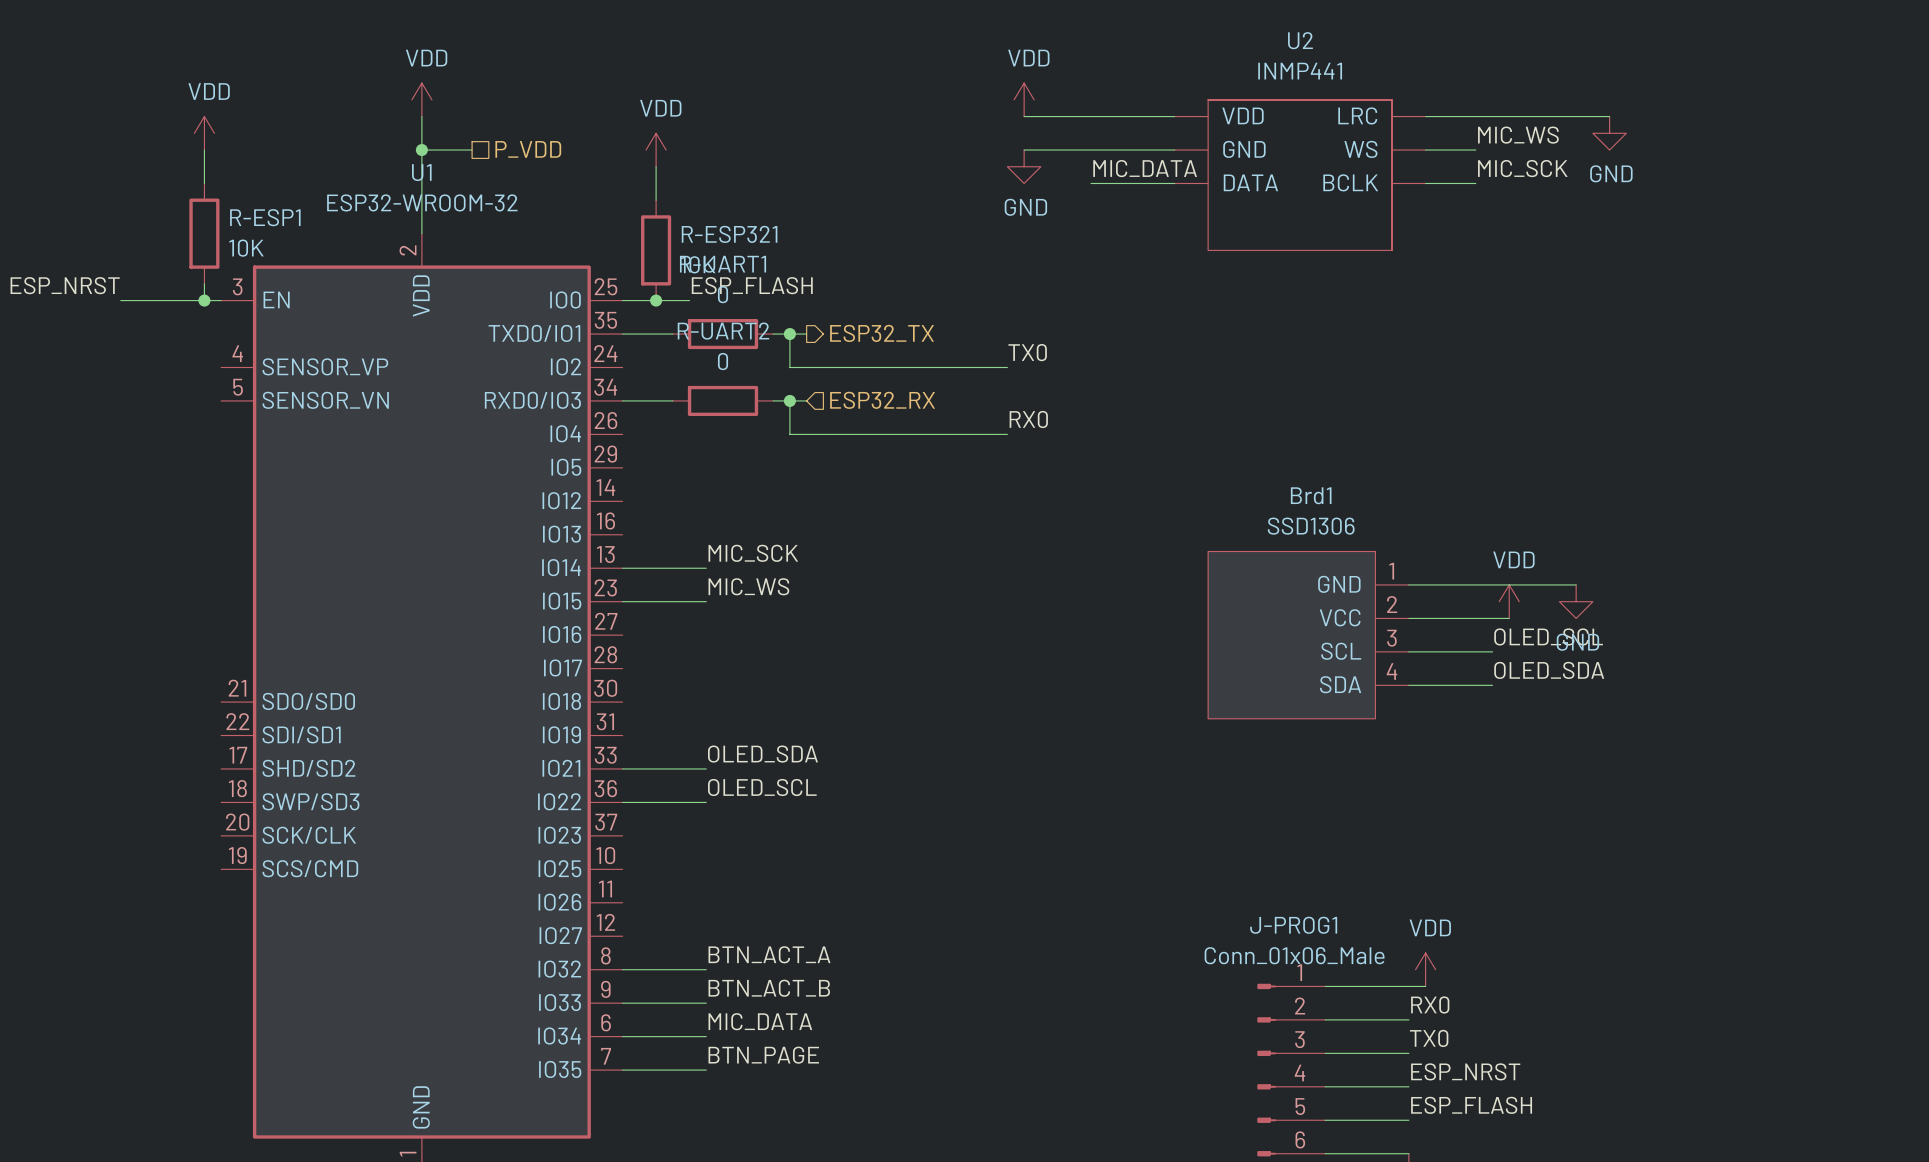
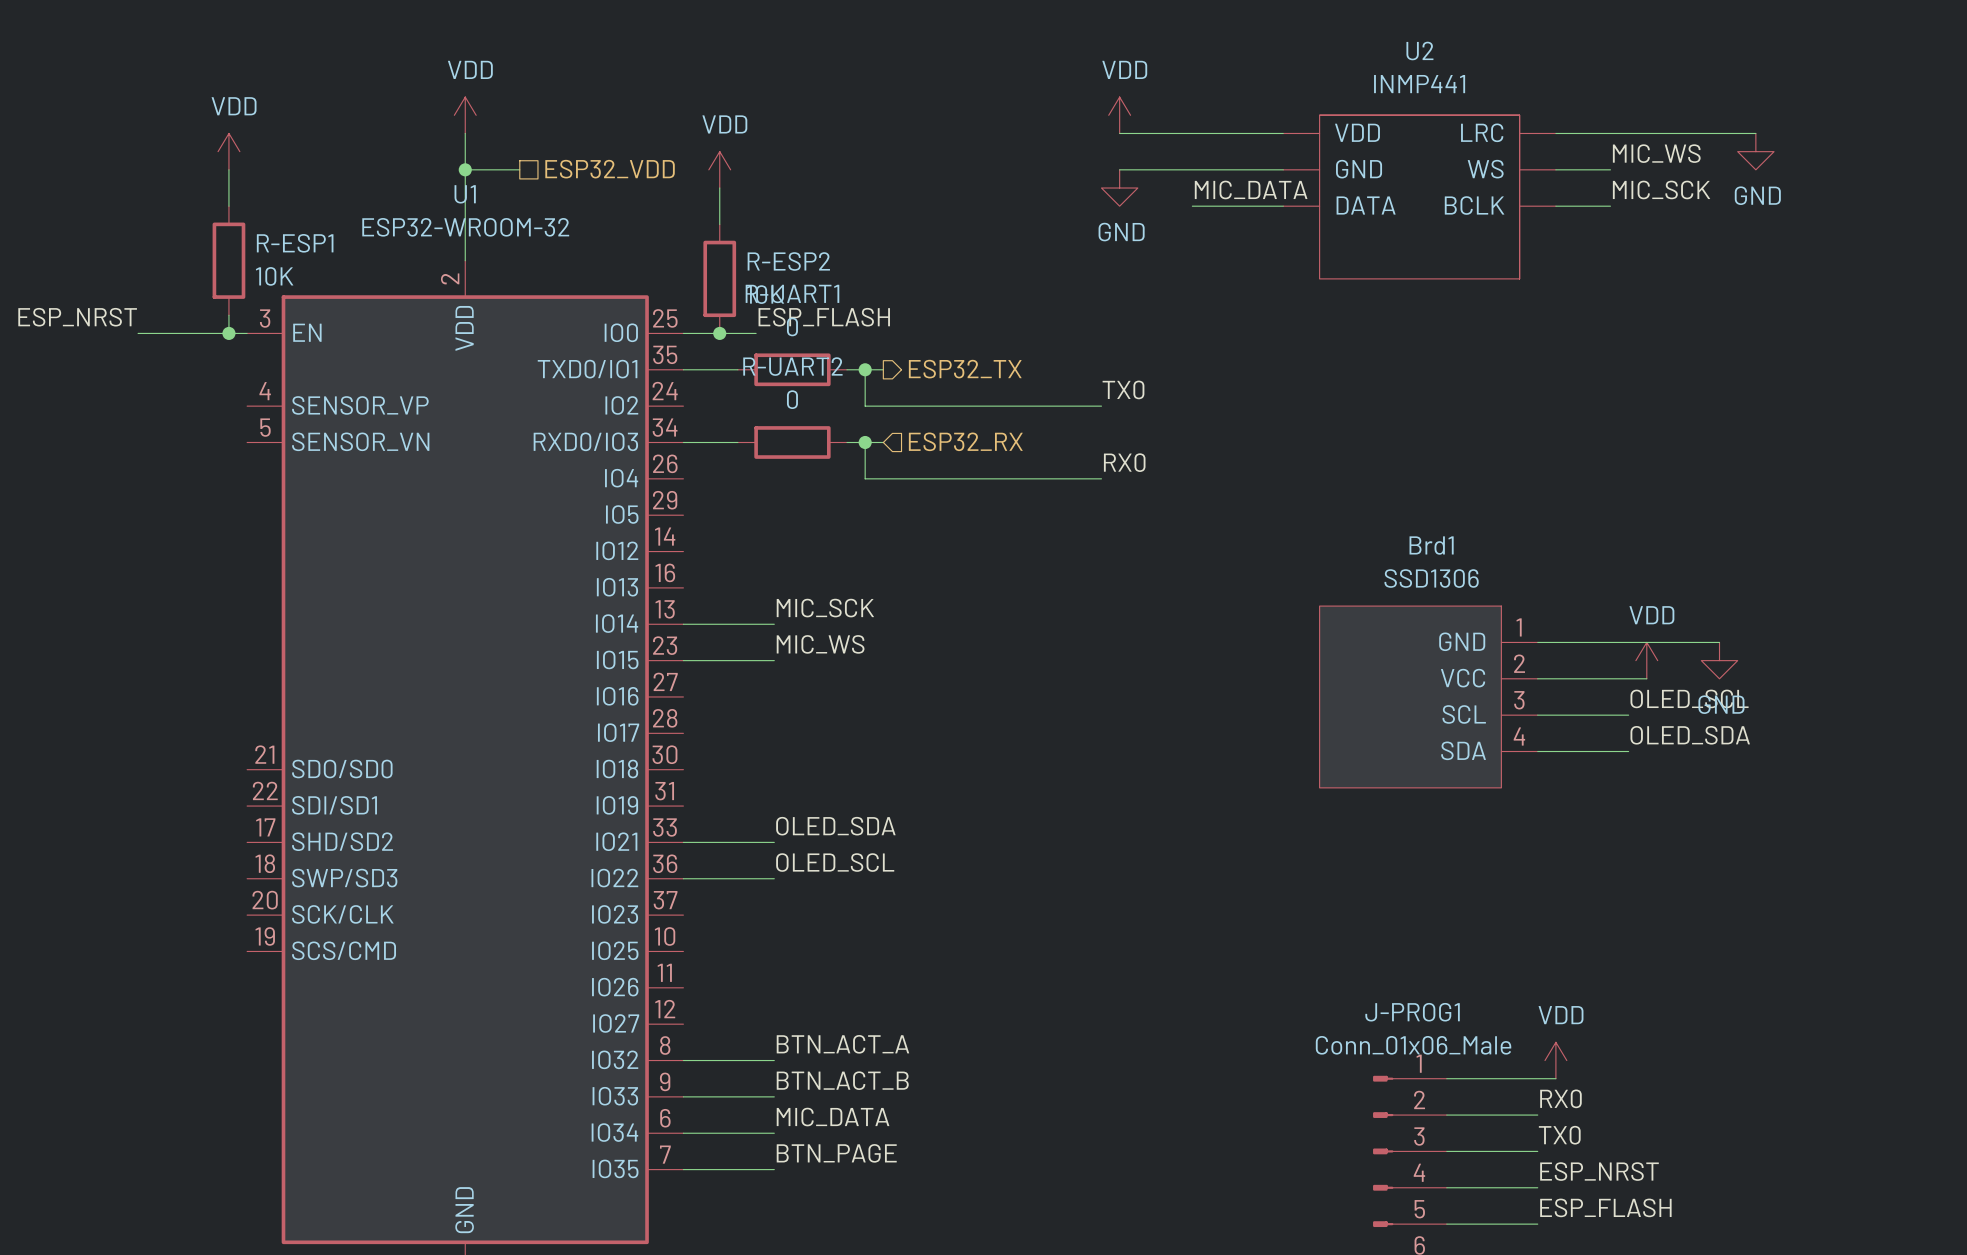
hierarchical label: P_VDD (528, 149) -> ESP32_VDD (610, 169)
R-ESP321 name: R-ESP321 (729, 234) -> R-ESP2 (788, 261)

